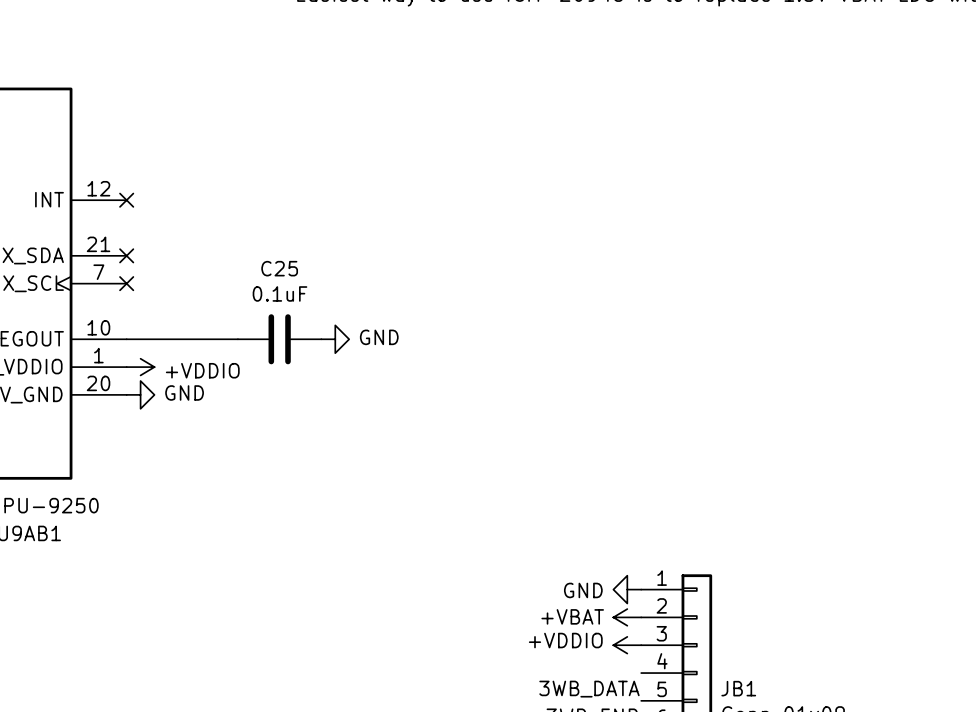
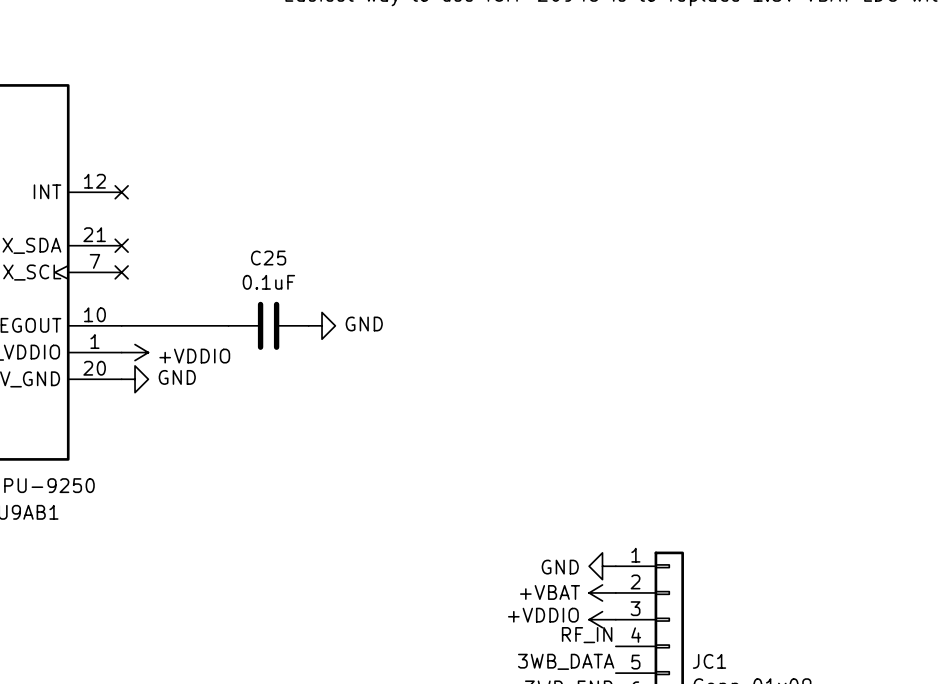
label: none -> RF_IN (587, 635)
JB1 name: JB1 (738, 688) -> JC1 (709, 661)

